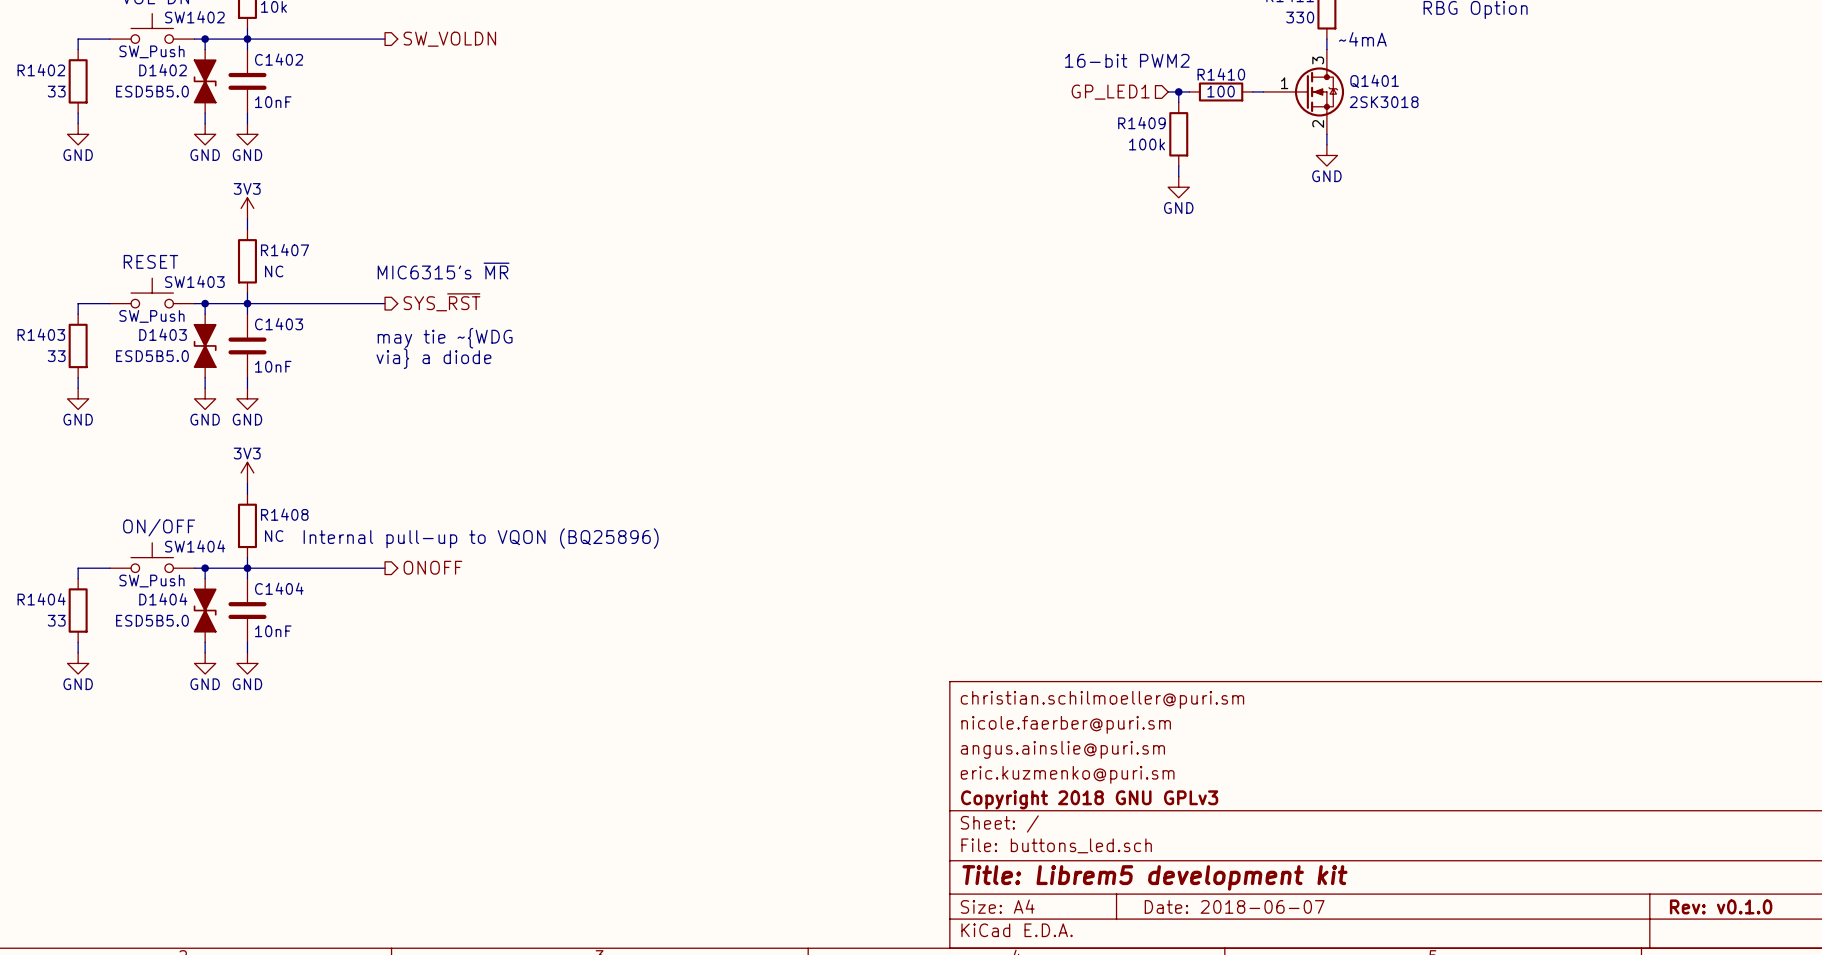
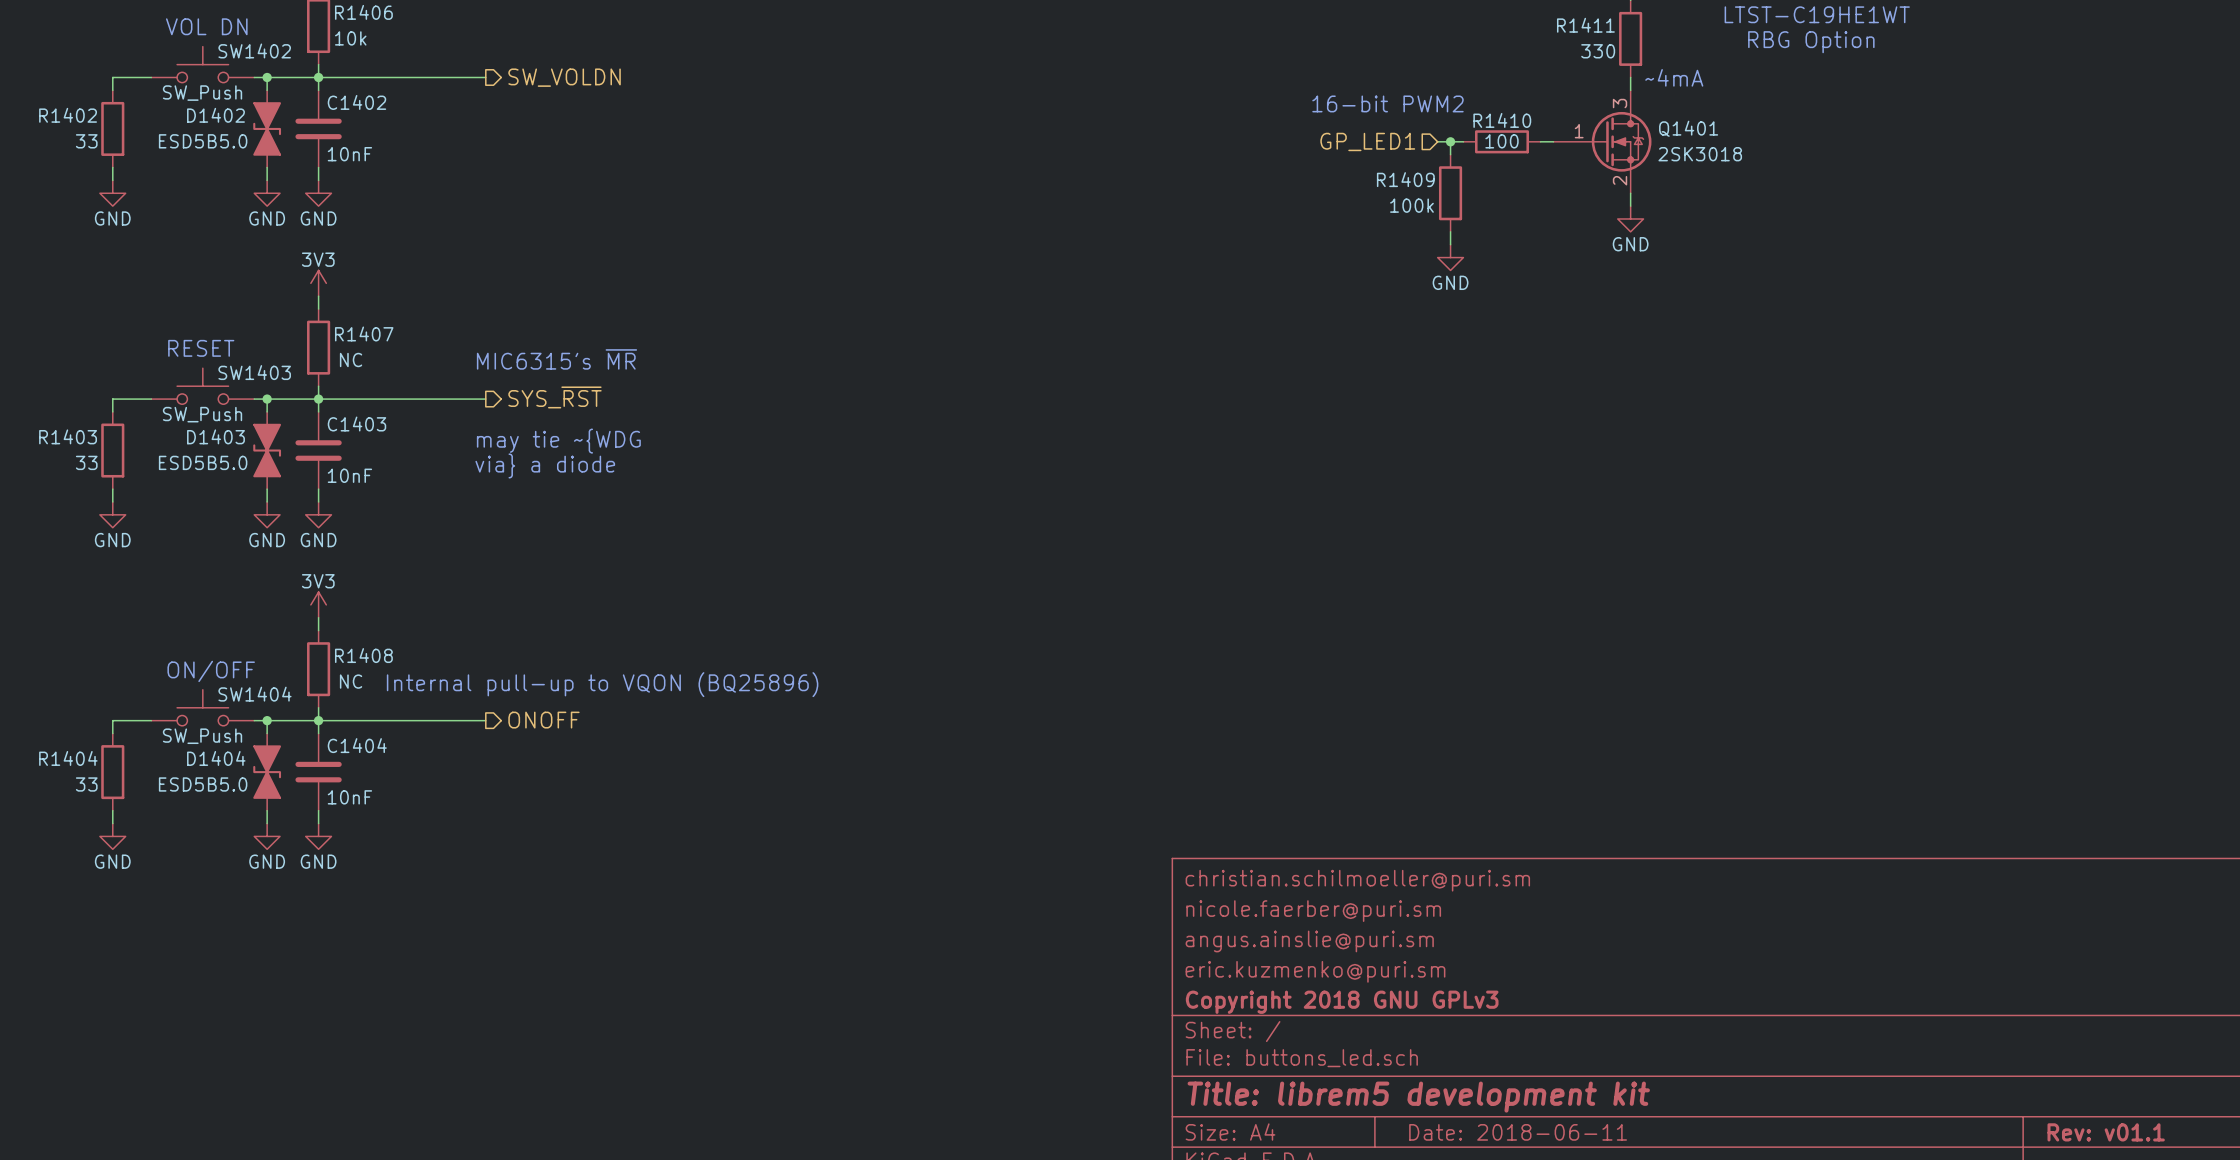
title block: Title: Librem5 development kit (1154, 877) -> Title: librem5 development kit (1418, 1097)
title block: Date: 2018-06-07 (1234, 906) -> Date: 2018-06-11 (1518, 1132)
title block: Rev: v0.1.0 (1721, 906) -> Rev: v01.1 (2106, 1132)

